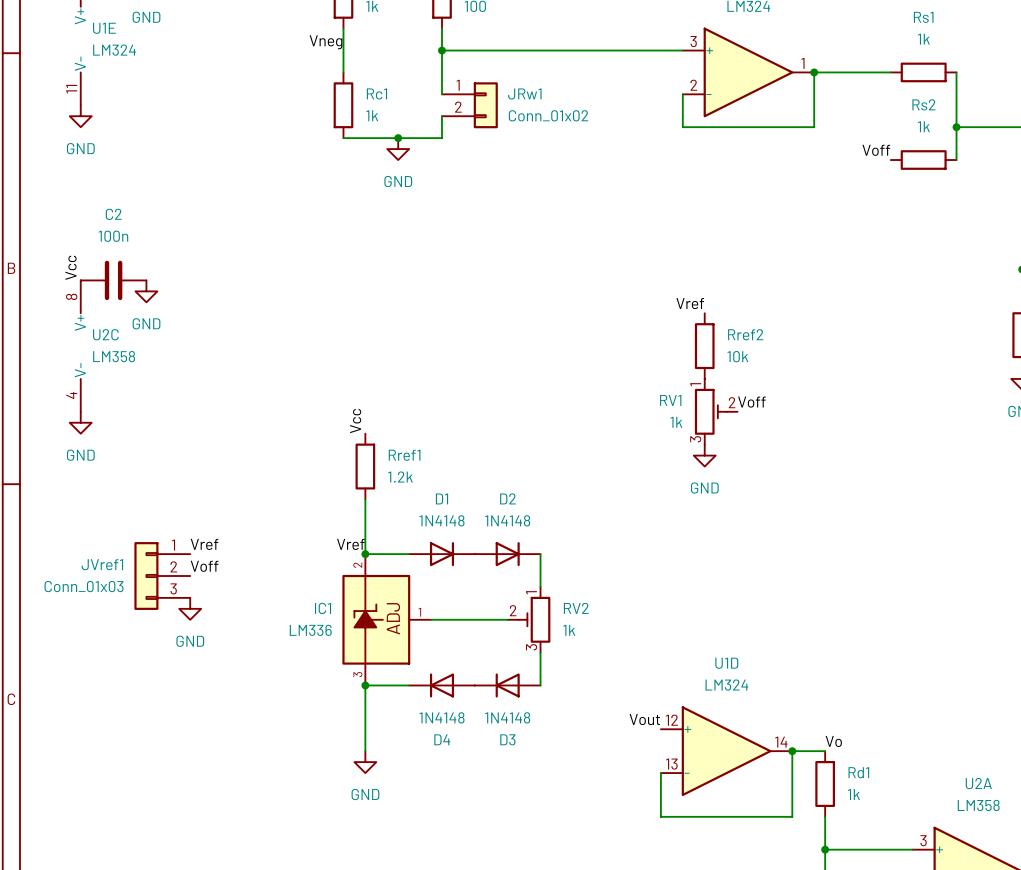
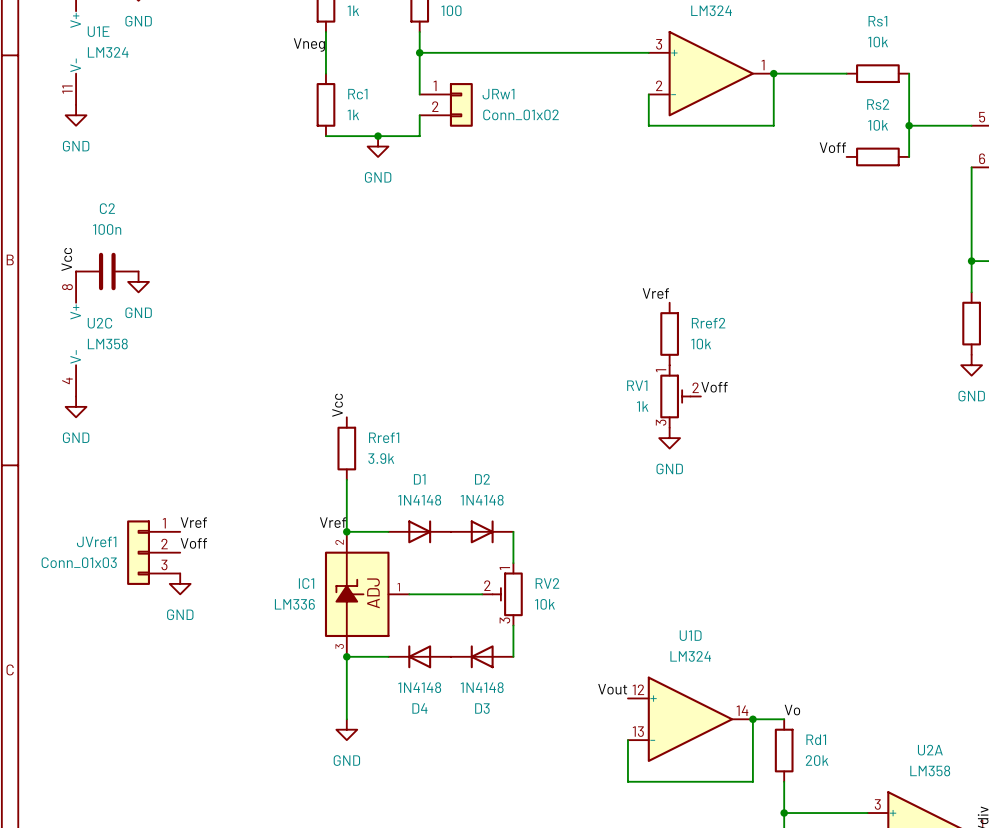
Rs1 value: 1k (923, 39) -> 10k (878, 42)
Rs2 value: 1k (923, 126) -> 10k (878, 125)
Rref1 value: 1.2k (400, 477) -> 3.9k (381, 458)
RV2 value: 1k (569, 630) -> 10k (544, 604)
Rd1 value: 1k (853, 794) -> 20k (817, 760)

